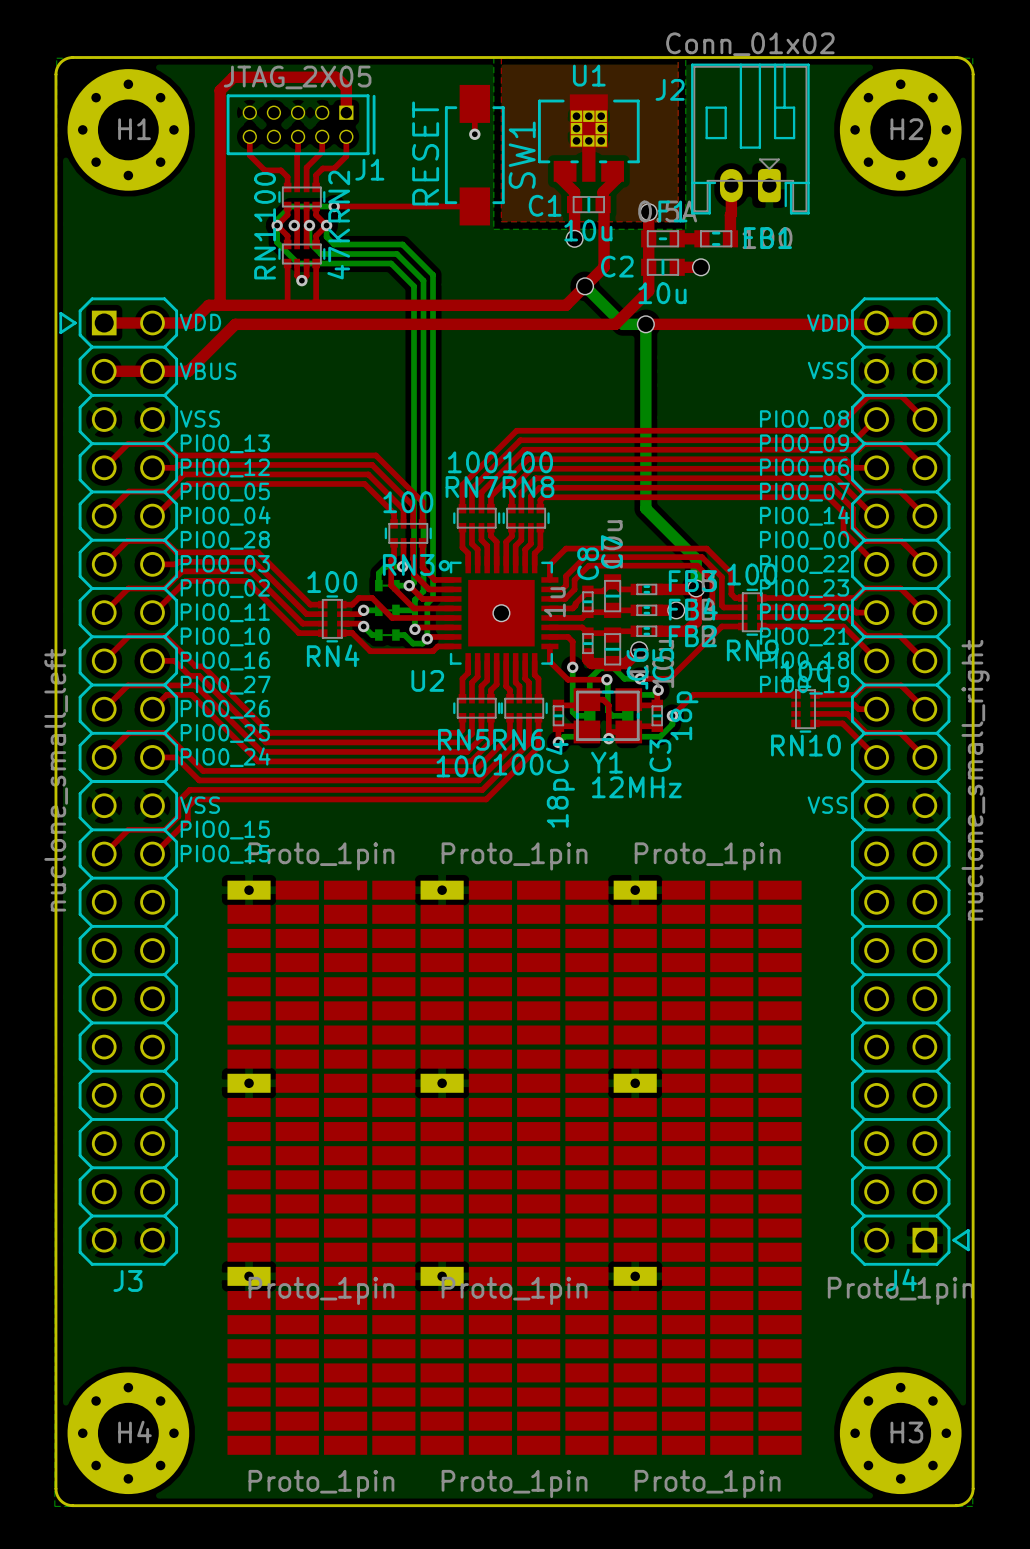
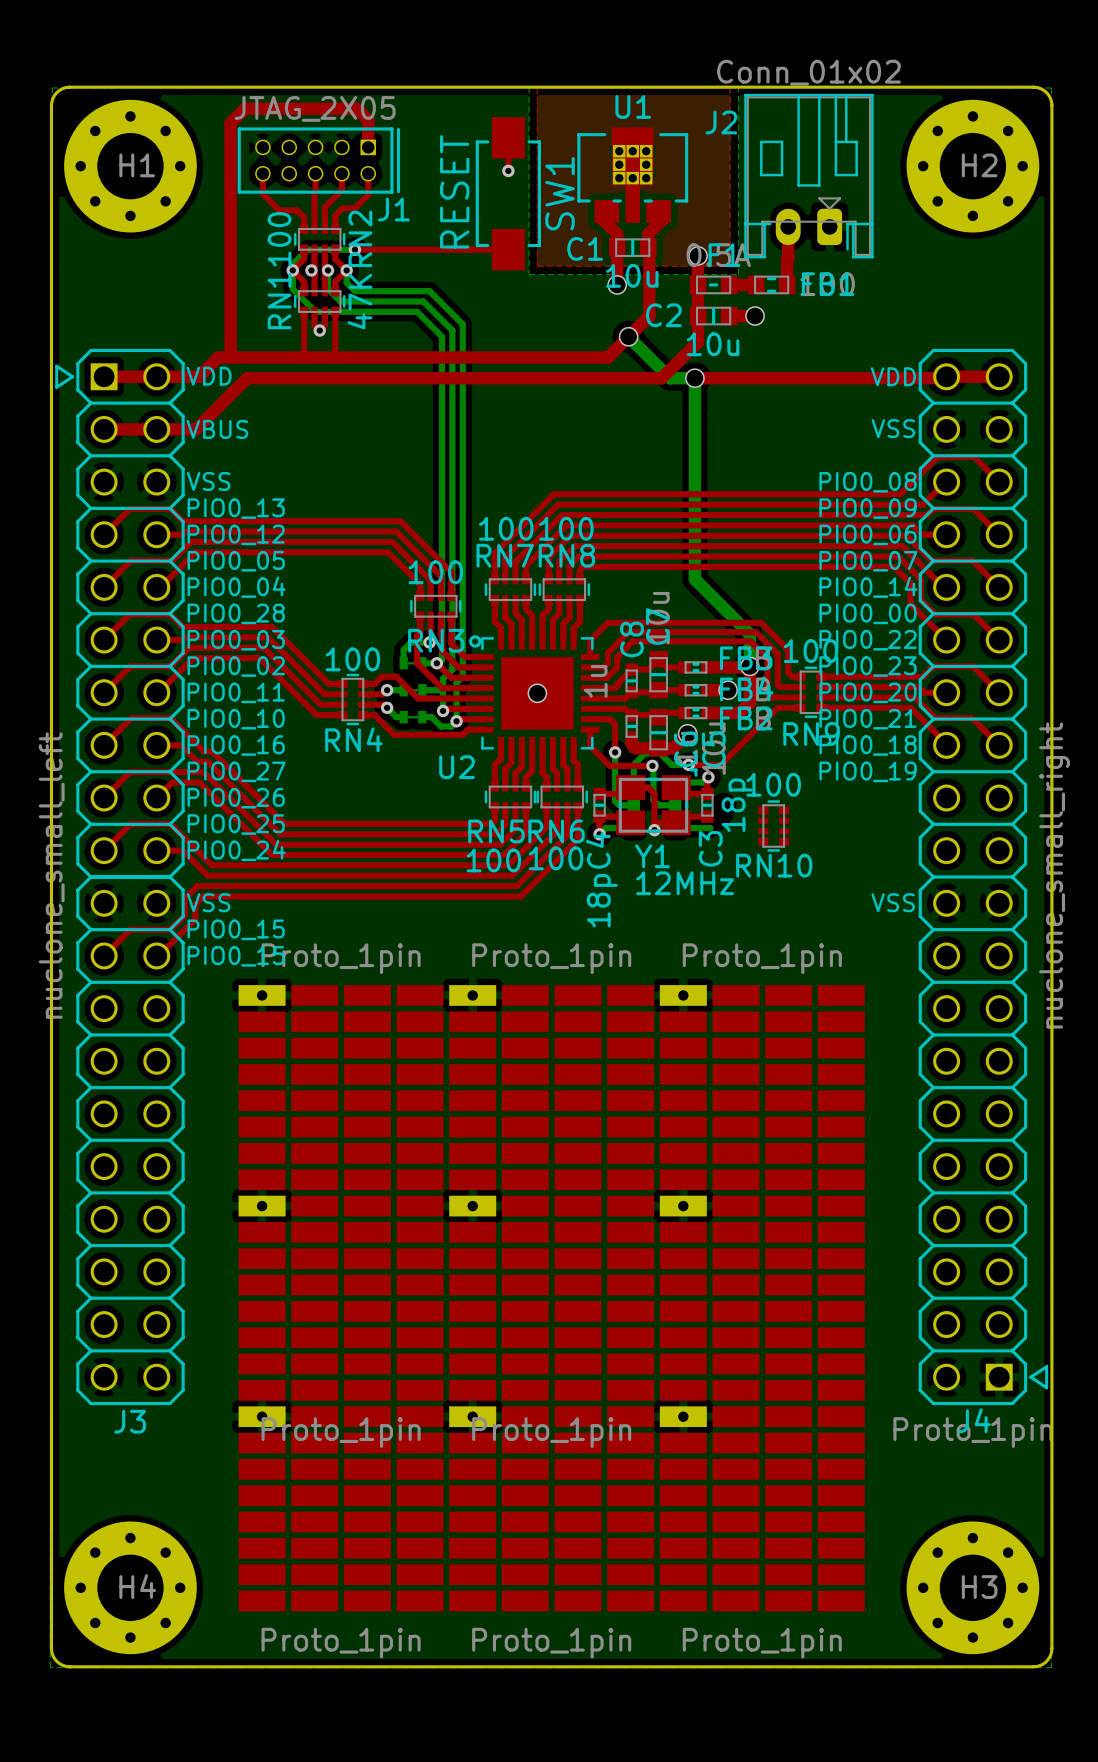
top track: (796, 694) (693, 694) (672, 715) -> none
top track: (815, 694) (854, 694) (864, 685) (901, 685) (924, 709) -> none
top track: (815, 704) (853, 704) (858, 709) (876, 709) -> none
RN10 position: (805, 709) -> (773, 825)
top track: (815, 713) (847, 713) (866, 732) (900, 732) (924, 757) -> none
bottom track: (672, 715) (672, 724) (660, 736) -> none
via: (672, 715) -> none
top track: (815, 723) (842, 723) (876, 757) -> none

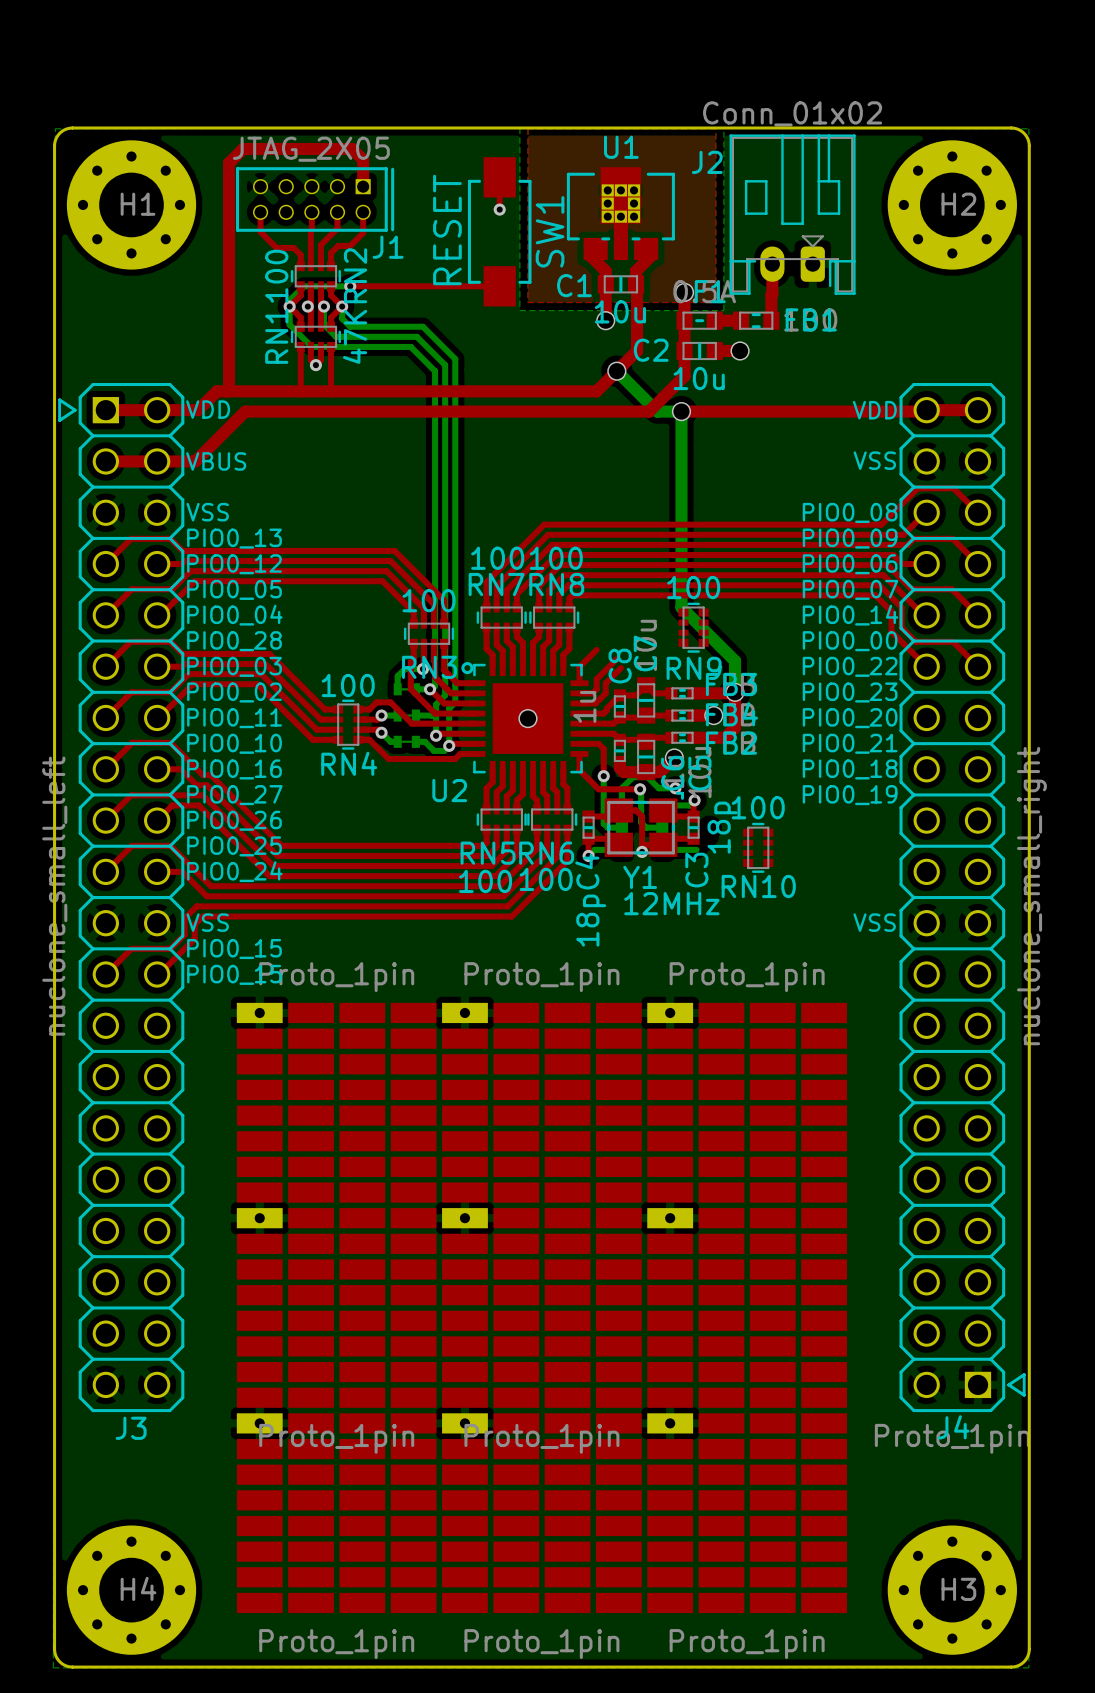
top track: (607, 622) (761, 622) (788, 649) (788, 672) (792, 676) (800, 676) -> none
top track: (628, 632) (756, 632) (777, 653) (777, 685) (779, 687) (800, 687) -> none
top track: (632, 641) (750, 641) (767, 658) (767, 693) (771, 697) (800, 697) -> none
top track: (821, 676) (922, 676) (933, 666) (972, 666) (999, 692) -> none
top track: (821, 687) (918, 687) (924, 692) (946, 692) -> none
RN9 position: (811, 692) -> (693, 627)
top track: (821, 697) (914, 697) (935, 718) (972, 718) (999, 745) -> none
top track: (800, 707) (777, 707) (720, 764) (688, 764) -> none
top track: (821, 707) (910, 707) (946, 745) -> none

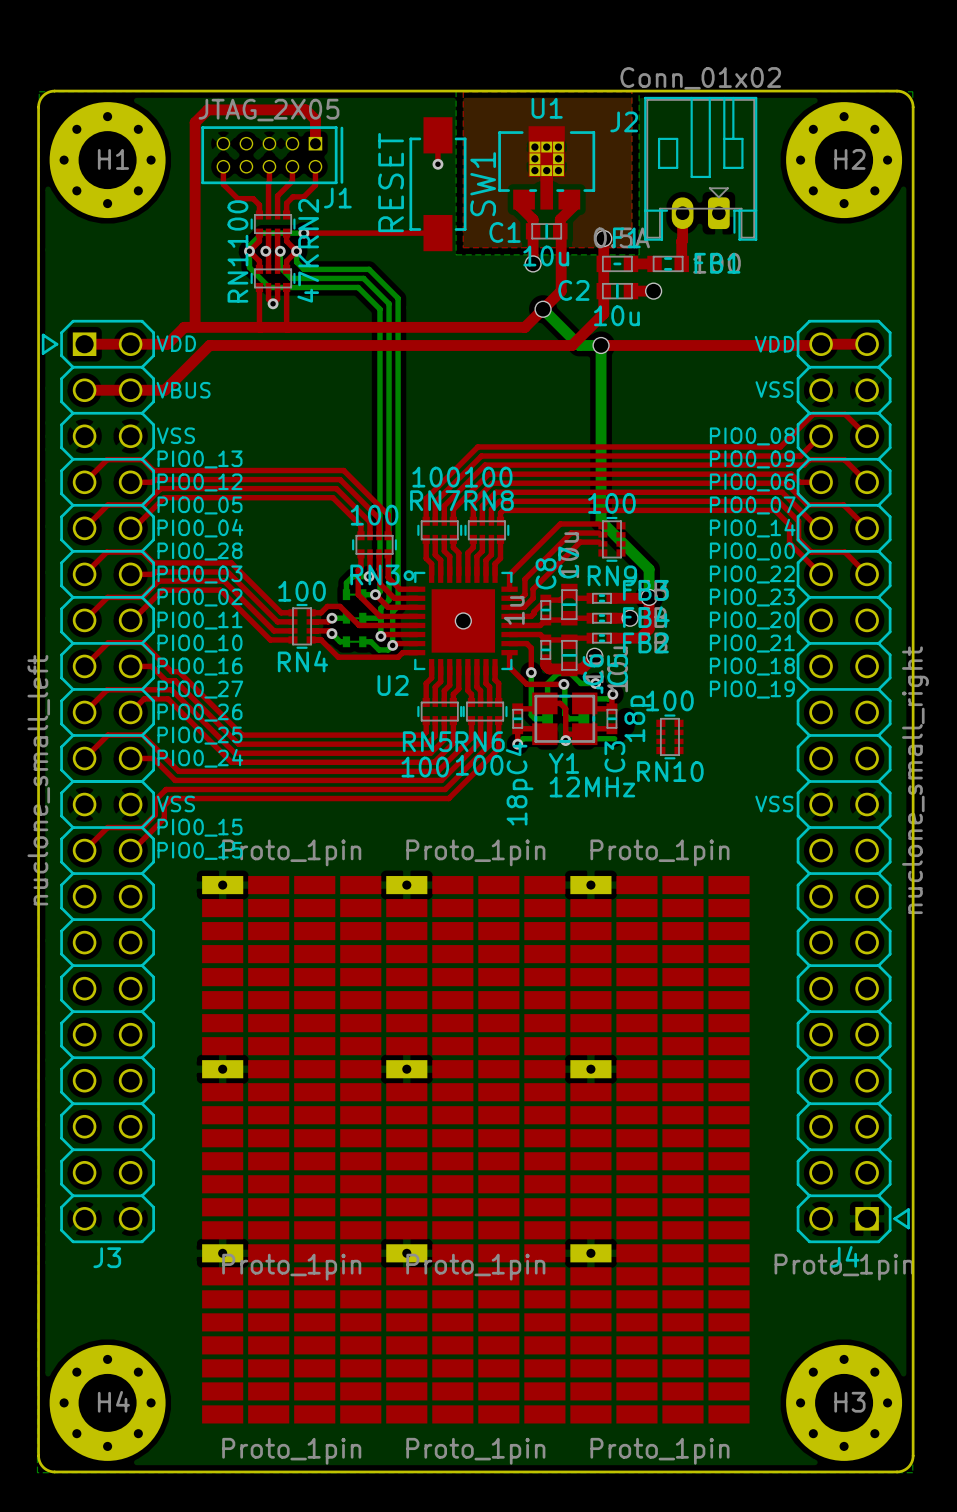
top track: none -> (599, 523) (560, 523) (524, 559)
top track: none -> (599, 542) (580, 542) (546, 575)
top track: (616, 659) (596, 679) -> (599, 533) (571, 533) (524, 579) (524, 585)

